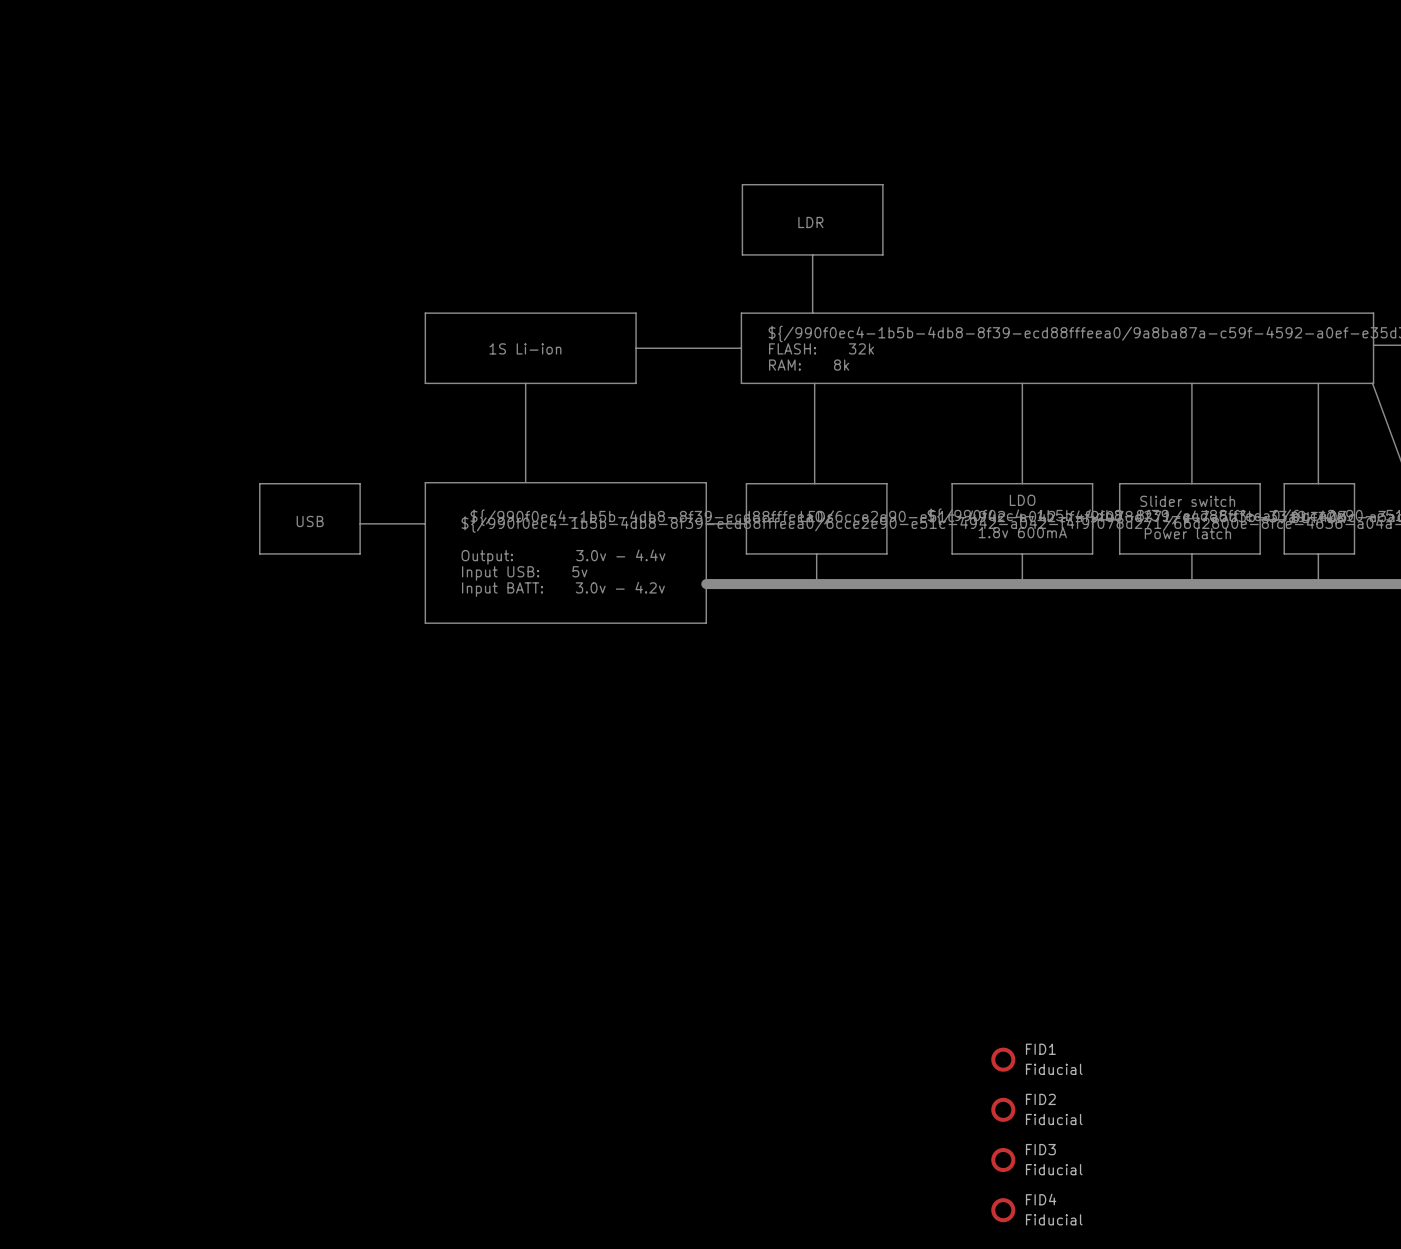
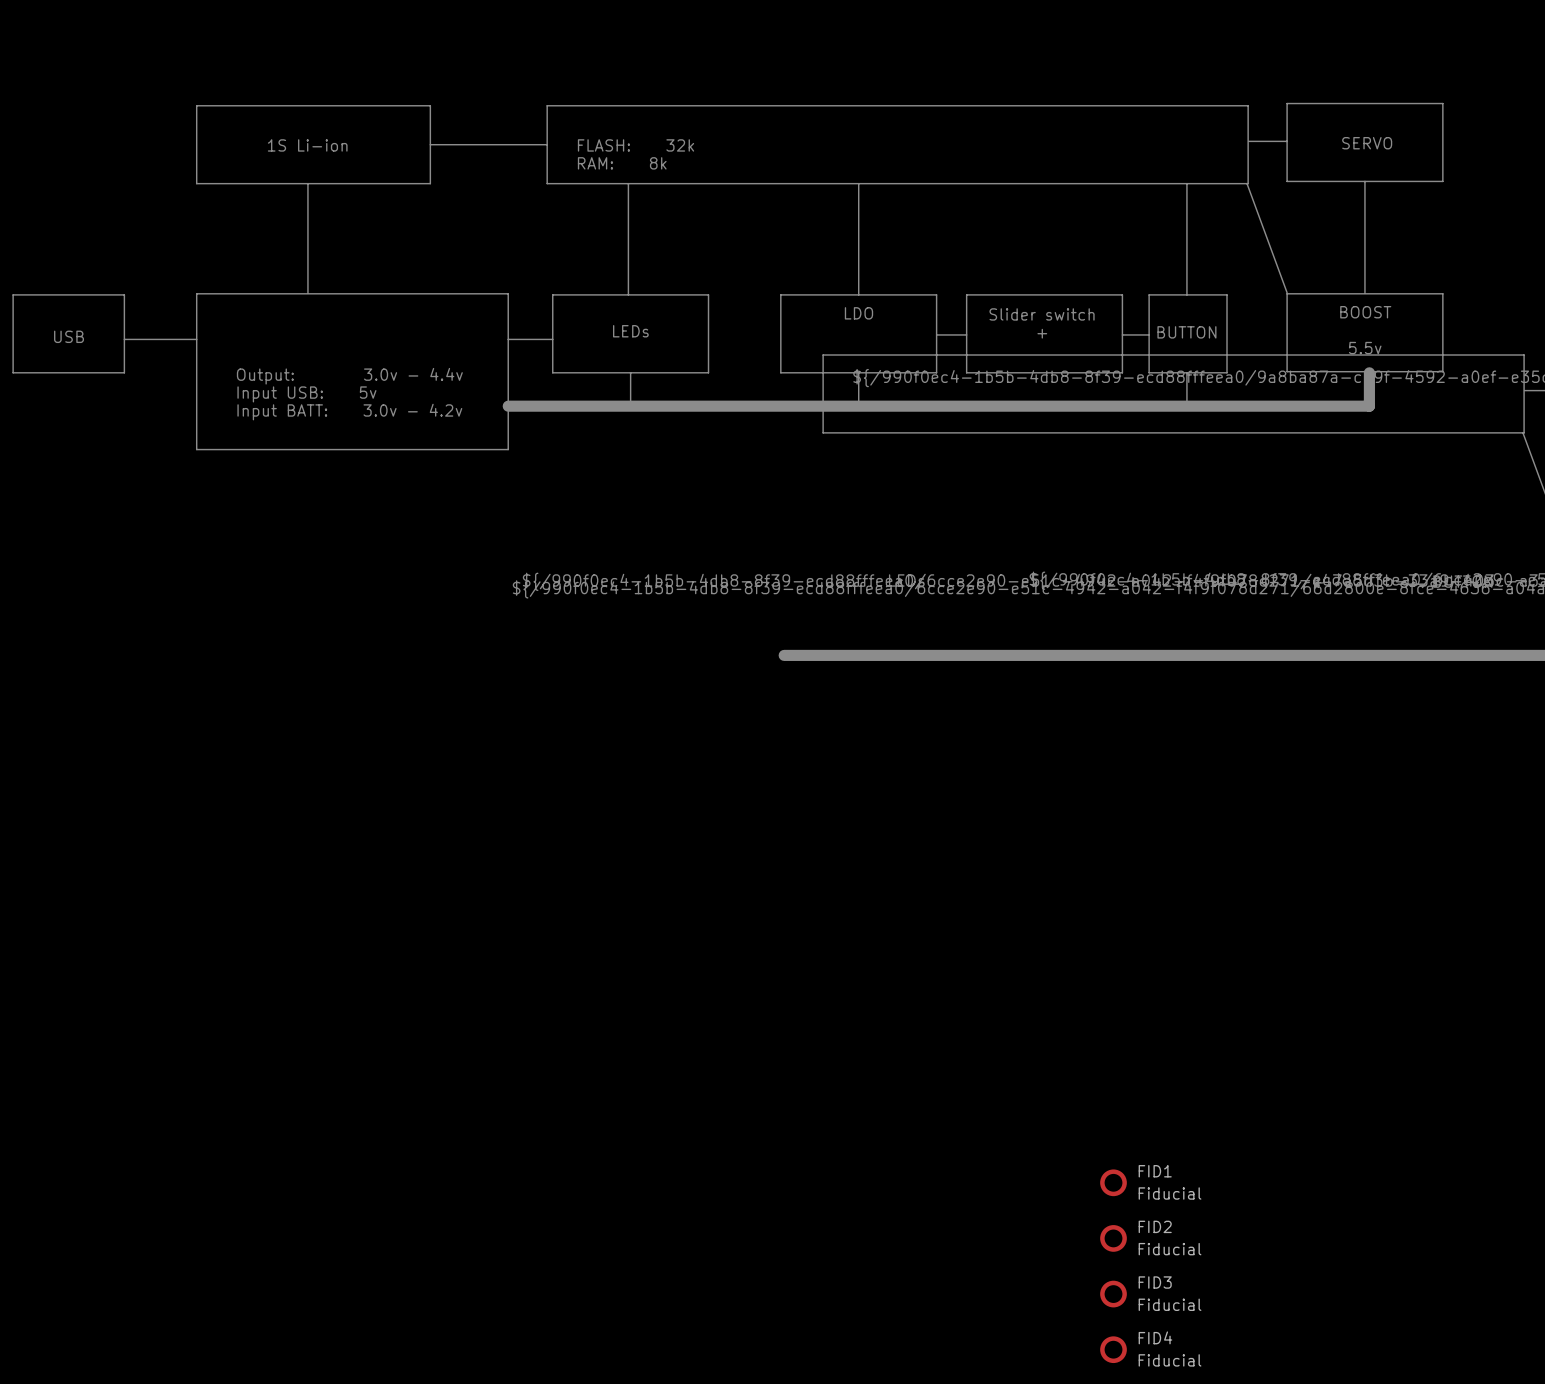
line: none -> (1287, 103) (1442, 103) (1442, 181) (1287, 181) (1287, 103)
line: none -> (196, 105) (430, 105) (430, 183) (196, 183) (196, 105)
line: none -> (547, 105) (1248, 105) (1248, 183) (547, 183) (547, 105)
line: none -> (1249, 141) (1287, 141)
text: none -> SERVO (1367, 143)
line: none -> (430, 144) (547, 144)
text: none -> 1S Li-ion (307, 145)
text: none -> FLASH: 32k (636, 145)
text: none -> RAM: 8k (622, 163)
line: none -> (1364, 181) (1364, 292)
line: none -> (307, 183) (307, 292)
line: none -> (628, 183) (628, 294)
line: none -> (858, 183) (858, 294)
line: none -> (1186, 183) (1186, 294)
line: none -> (1247, 183) (1287, 292)
line: (742, 184) (882, 184) (882, 254) (742, 254) (742, 184) -> (780, 294) (936, 294) (936, 372) (780, 372) (780, 294)
text: LDR (810, 222) -> none
line: (812, 254) (812, 313) -> none
line: none -> (196, 293) (196, 449) (508, 449) (508, 293) (196, 293)
line: none -> (1287, 293) (1442, 293) (1442, 371) (1287, 371) (1287, 293)
line: none -> (13, 294) (124, 294) (124, 372) (13, 372) (13, 294)
line: none -> (552, 294) (708, 294) (708, 372) (552, 372) (552, 294)
line: none -> (966, 294) (1122, 294) (1122, 372) (966, 372) (966, 294)
line: none -> (1149, 294) (1227, 294) (1227, 372) (1149, 372) (1149, 294)
text: none -> BOOST (1365, 312)
text: none -> LDO (858, 313)
text: none -> Slider switch (1042, 314)
text: none -> LEDs (630, 331)
text: none -> BUTTON (1186, 332)
text: none -> + (1042, 333)
line: none -> (937, 334) (966, 334)
line: none -> (1122, 334) (1149, 334)
text: none -> USB (69, 336)
line: none -> (124, 339) (196, 339)
line: none -> (508, 339) (552, 339)
text: none -> 5.5v (1365, 348)
line: (425, 313) (636, 313) (636, 383) (425, 383) (425, 313) -> none
line: none -> (630, 372) (630, 406)
line: none -> (858, 372) (858, 406)
line: none -> (1186, 372) (1186, 406)
line: none -> (1369, 372) (1369, 406) (508, 406)
text: none -> Output: 3.0v - 4.4v (349, 376)
text: none -> Input USB: 5v (306, 394)
text: 1S Li-ion (525, 348) -> none
line: (636, 348) (741, 348) -> none
text: FLASH: 32k (821, 348) -> none
text: none -> Input BATT: 3.0v - 4.2v (349, 412)
text: RAM: 8k (809, 365) -> none
line: (525, 383) (525, 481) -> none
line: (814, 383) (814, 483) -> none
line: (1022, 383) (1022, 483) -> none
line: (1191, 383) (1191, 483) -> none
line: (1318, 383) (1318, 483) -> none
line: (425, 482) (425, 623) (706, 623) (706, 482) (425, 482) -> none
line: (259, 483) (360, 483) (360, 553) (259, 553) (259, 483) -> none
line: (746, 483) (886, 483) (886, 553) (746, 553) (746, 483) -> none
line: (952, 483) (1092, 483) (1092, 553) (952, 553) (952, 483) -> none
line: (1119, 483) (1260, 483) (1260, 553) (1119, 553) (1119, 483) -> none
line: (1284, 483) (1354, 483) (1354, 553) (1284, 553) (1284, 483) -> none
text: LDO (1022, 500) -> none
text: Slider switch (1187, 501) -> none
text: USB (310, 521) -> none
line: (360, 523) (425, 523) -> none
line: (706, 523) (746, 523) -> none
text: 1.8v 600mA (1022, 532) -> none
text: Power latch (1187, 533) -> none
line: (816, 553) (816, 584) -> none
line: (1022, 553) (1022, 584) -> none
line: (1191, 553) (1191, 582) (1189, 582) -> none
line: (1318, 553) (1318, 584) -> none
text: Output: 3.0v - 4.4v (563, 557) -> none
text: Input USB: 5v (524, 573) -> none
text: Input BATT: 3.0v - 4.2v (563, 589) -> none

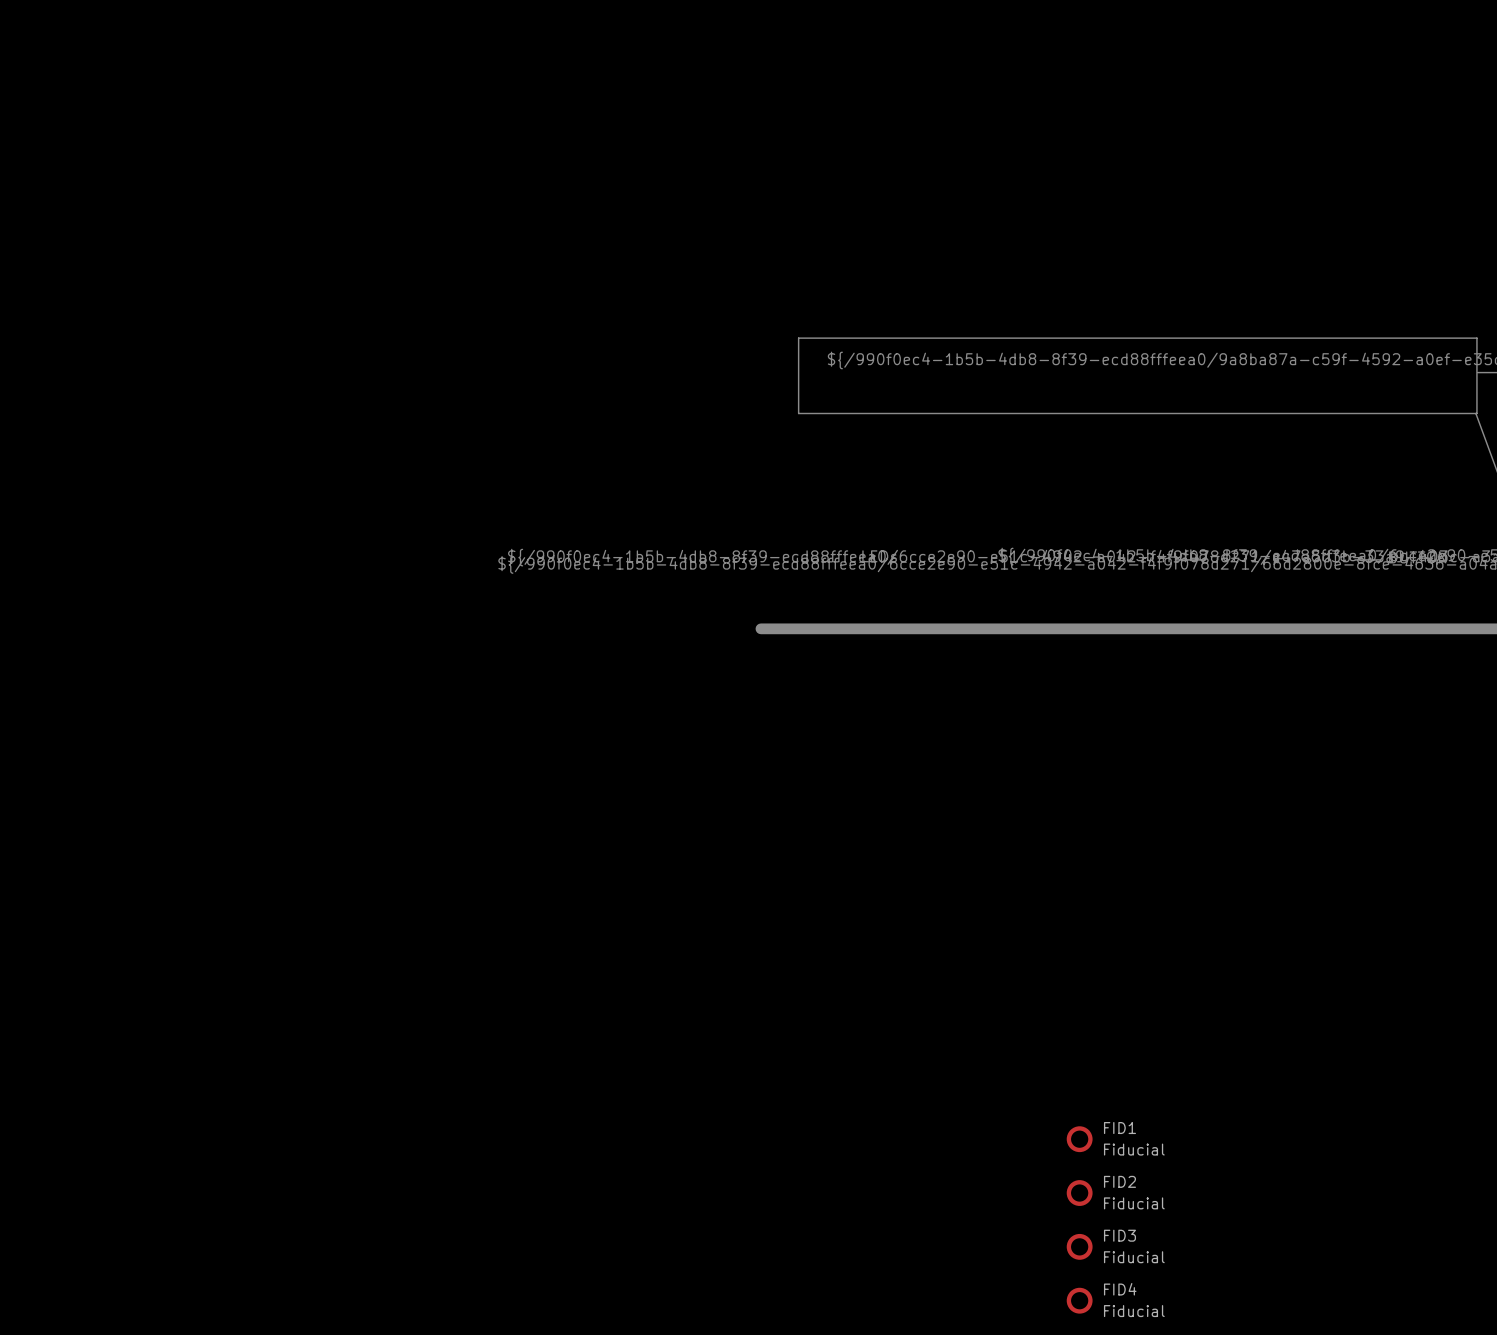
line: (1287, 103) (1442, 103) (1442, 181) (1287, 181) (1287, 103) -> none
line: (196, 105) (430, 105) (430, 183) (196, 183) (196, 105) -> none
line: (547, 105) (1248, 105) (1248, 183) (547, 183) (547, 105) -> none
line: (1249, 141) (1287, 141) -> none
text: SERVO (1367, 143) -> none
line: (430, 144) (547, 144) -> none
text: 1S Li-ion (307, 145) -> none
text: FLASH: 32k (636, 145) -> none
text: RAM: 8k (622, 163) -> none
line: (1364, 181) (1364, 292) -> none
line: (307, 183) (307, 292) -> none
line: (628, 183) (628, 294) -> none
line: (858, 183) (858, 294) -> none
line: (1186, 183) (1186, 294) -> none
line: (1247, 183) (1287, 292) -> none
line: (196, 293) (196, 449) (508, 449) (508, 293) (196, 293) -> none
line: (1287, 293) (1442, 293) (1442, 371) (1287, 371) (1287, 293) -> none
line: (13, 294) (124, 294) (124, 372) (13, 372) (13, 294) -> none
line: (552, 294) (708, 294) (708, 372) (552, 372) (552, 294) -> none
line: (780, 294) (936, 294) (936, 372) (780, 372) (780, 294) -> none
line: (966, 294) (1122, 294) (1122, 372) (966, 372) (966, 294) -> none
line: (1149, 294) (1227, 294) (1227, 372) (1149, 372) (1149, 294) -> none
text: BOOST (1365, 312) -> none
text: LDO (858, 313) -> none
text: Slider switch (1042, 314) -> none
text: LEDs (630, 331) -> none
text: BUTTON (1186, 332) -> none
text: + (1042, 333) -> none
line: (937, 334) (966, 334) -> none
line: (1122, 334) (1149, 334) -> none
text: USB (69, 336) -> none
line: (124, 339) (196, 339) -> none
line: (508, 339) (552, 339) -> none
text: 5.5v (1365, 348) -> none
line: (630, 372) (630, 406) -> none
line: (858, 372) (858, 406) -> none
line: (1186, 372) (1186, 406) -> none
line: (1369, 372) (1369, 406) (508, 406) -> none
text: Output: 3.0v - 4.4v (349, 376) -> none
text: Input USB: 5v (306, 394) -> none
text: Input BATT: 3.0v - 4.2v (349, 412) -> none

